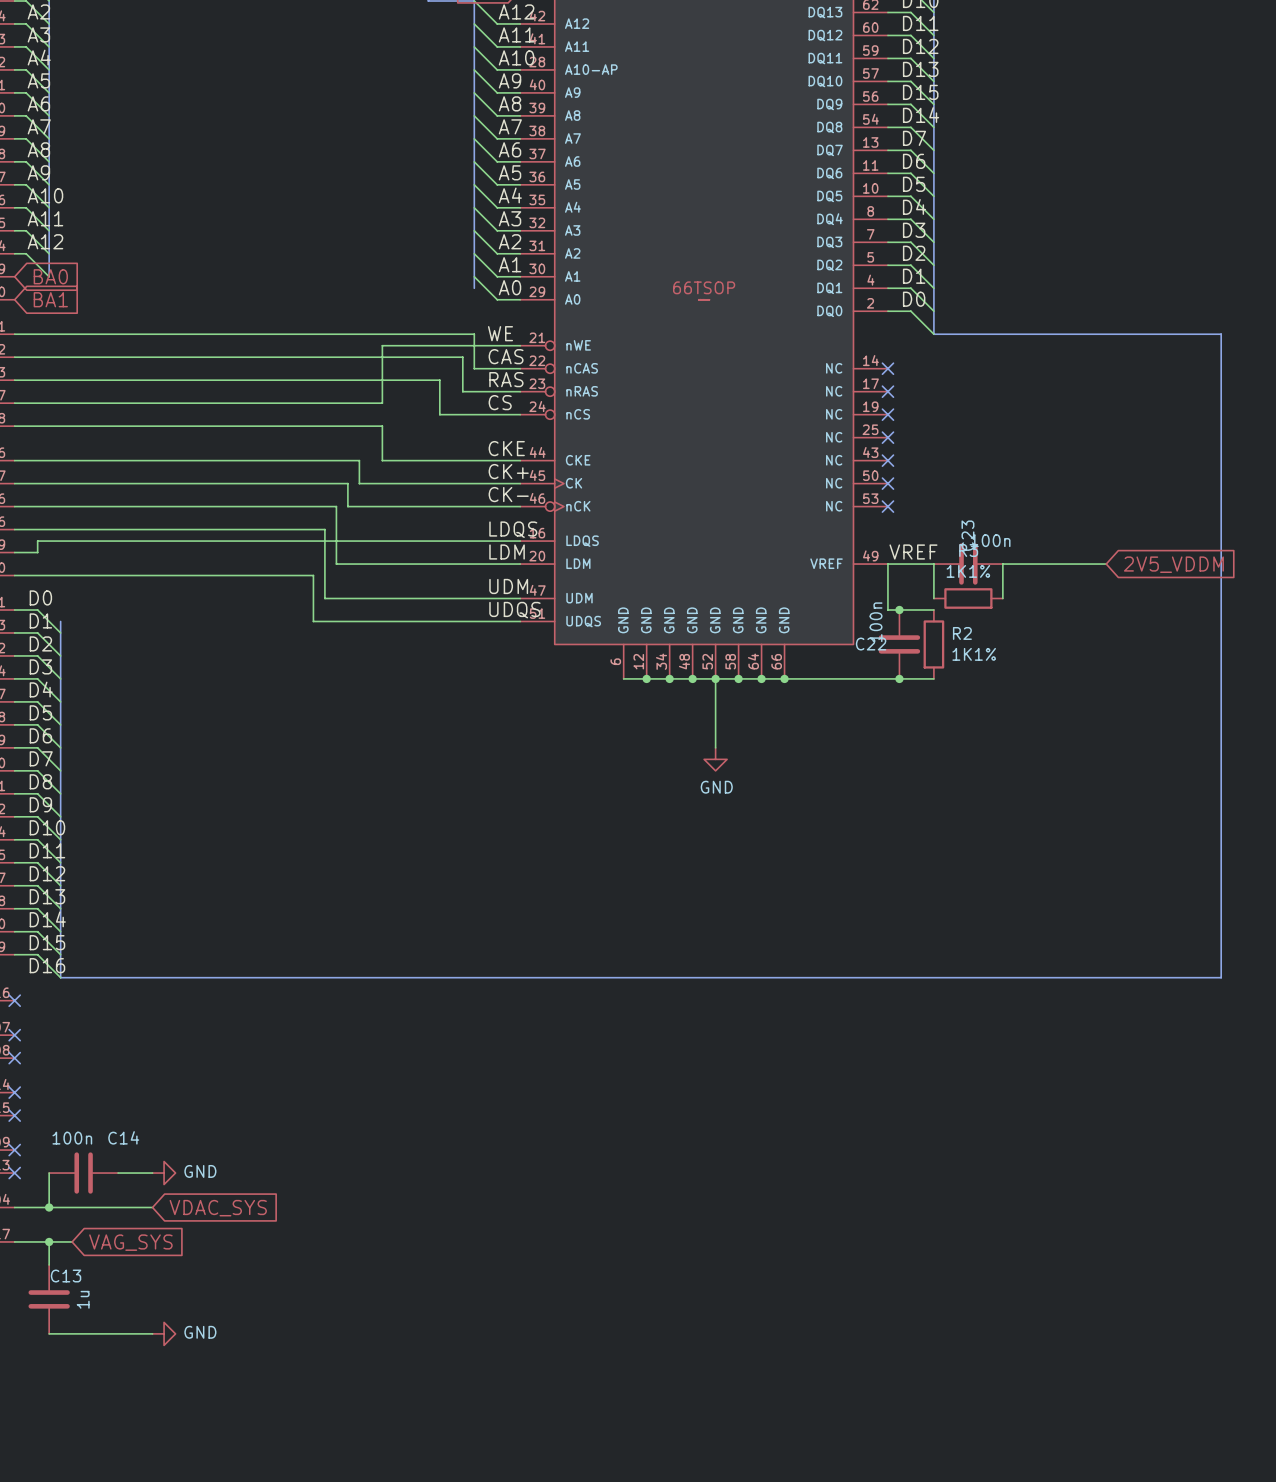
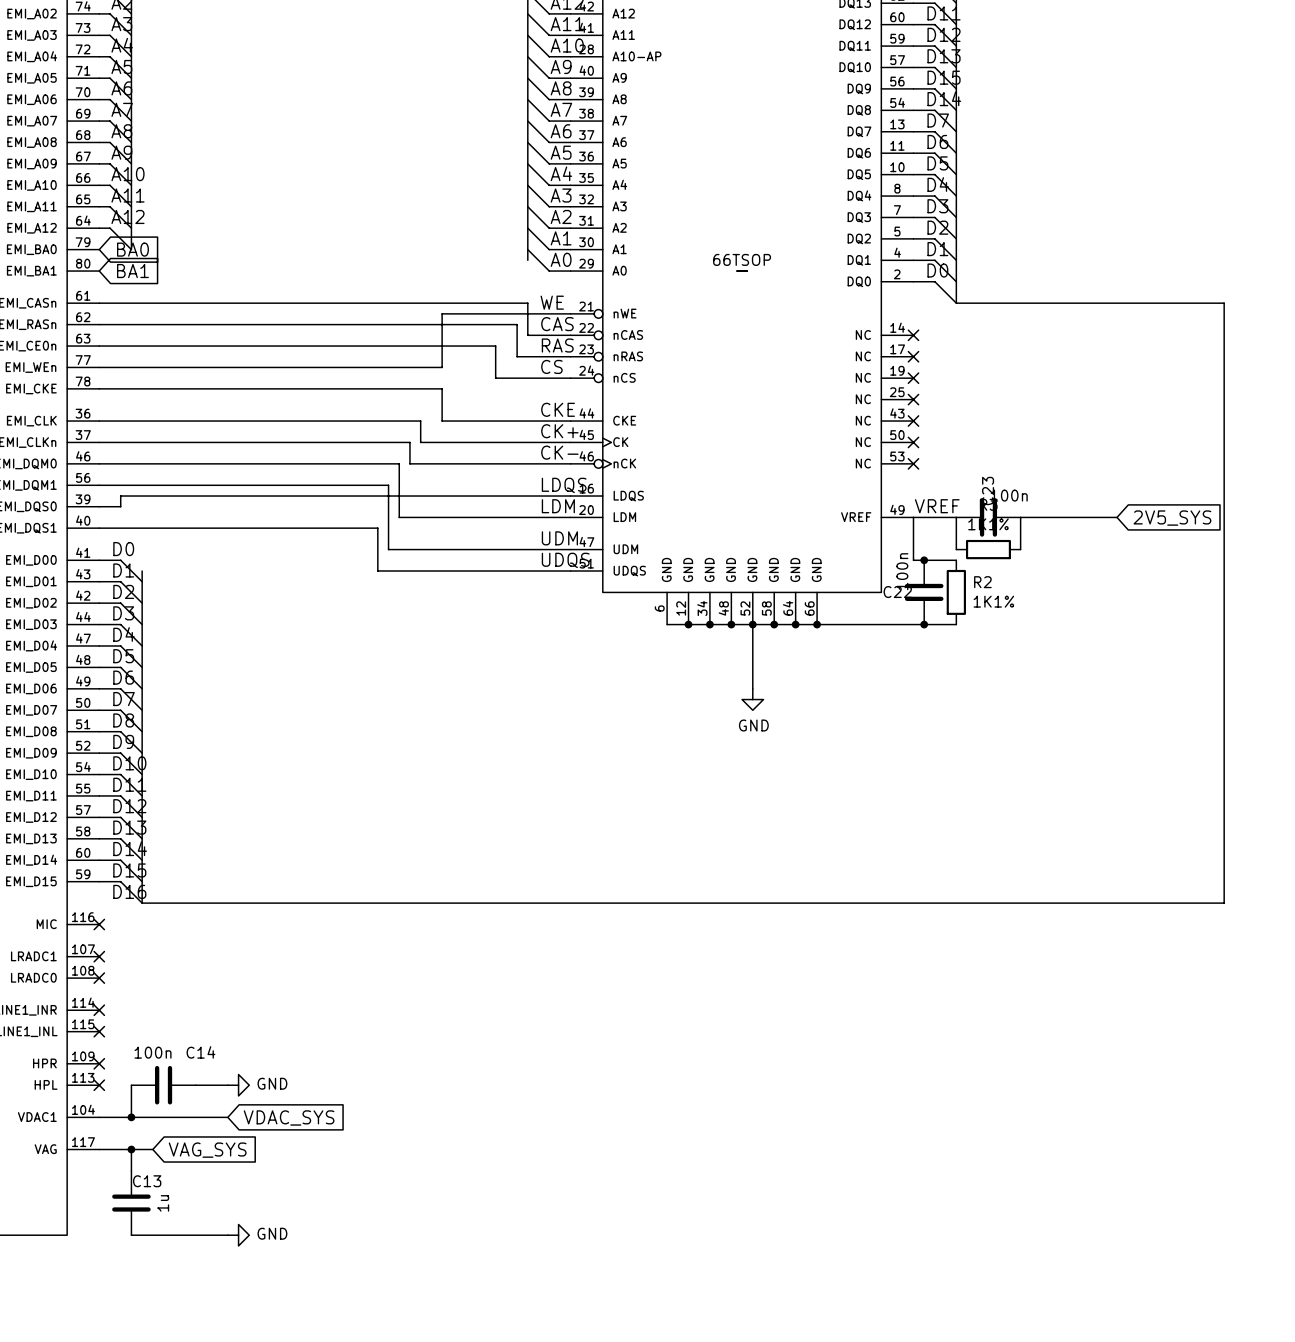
global label: 2V5_VDDM (1173, 564) -> 2V5_SYS (1172, 518)

